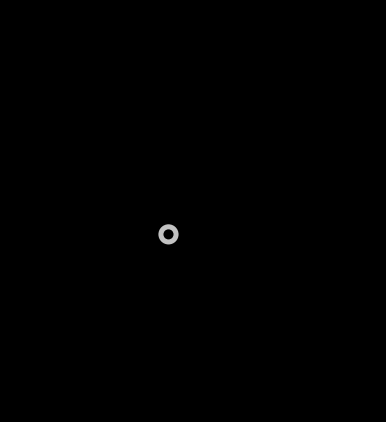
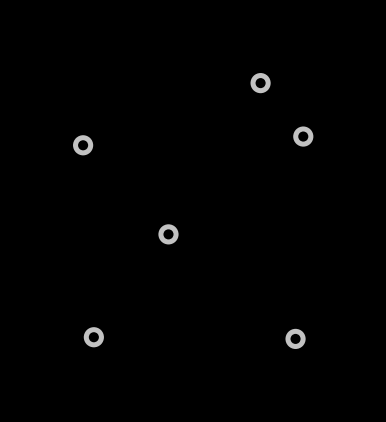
via: none -> (260, 83)
via: none -> (303, 136)
via: none -> (83, 145)
via: none -> (93, 337)
via: none -> (295, 338)

